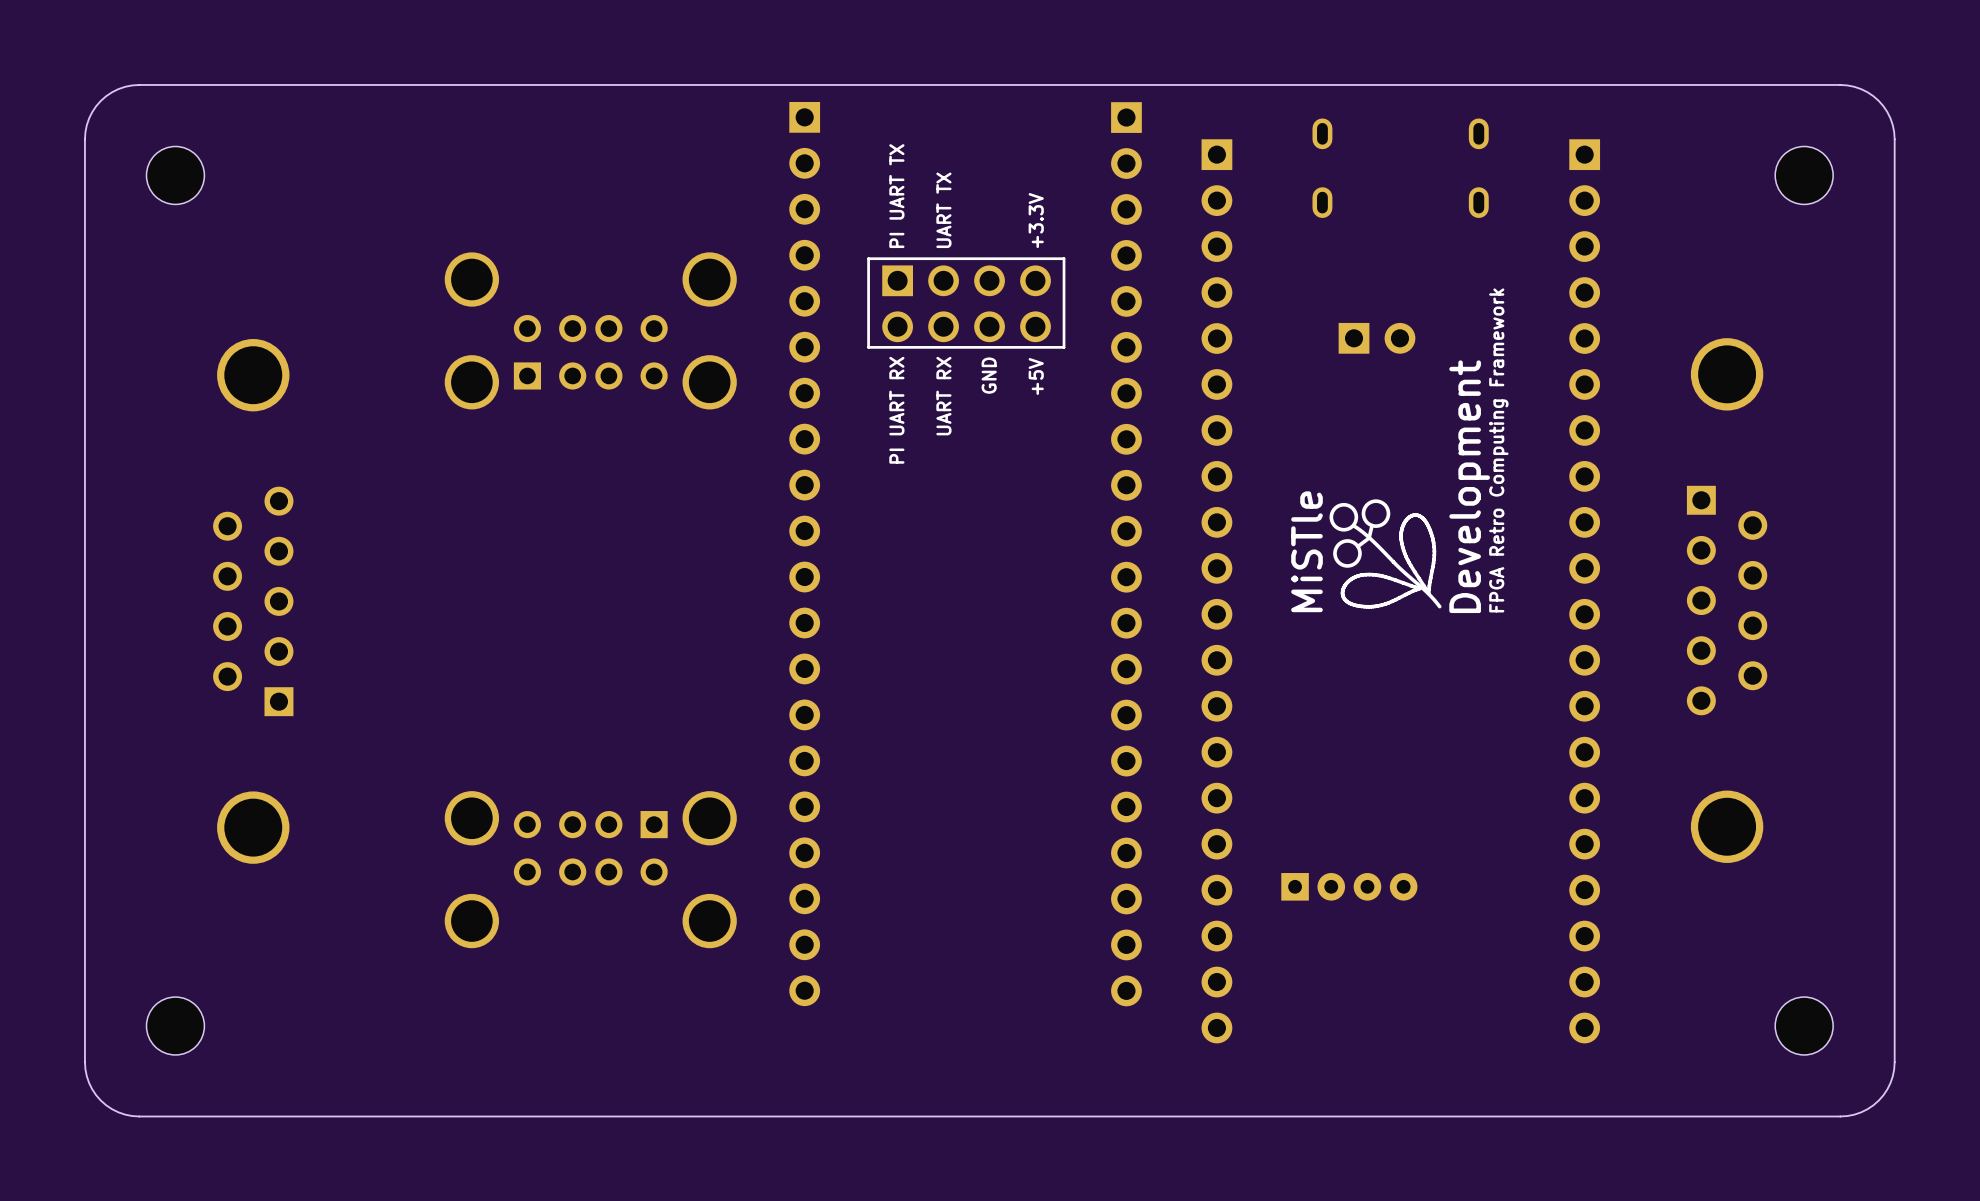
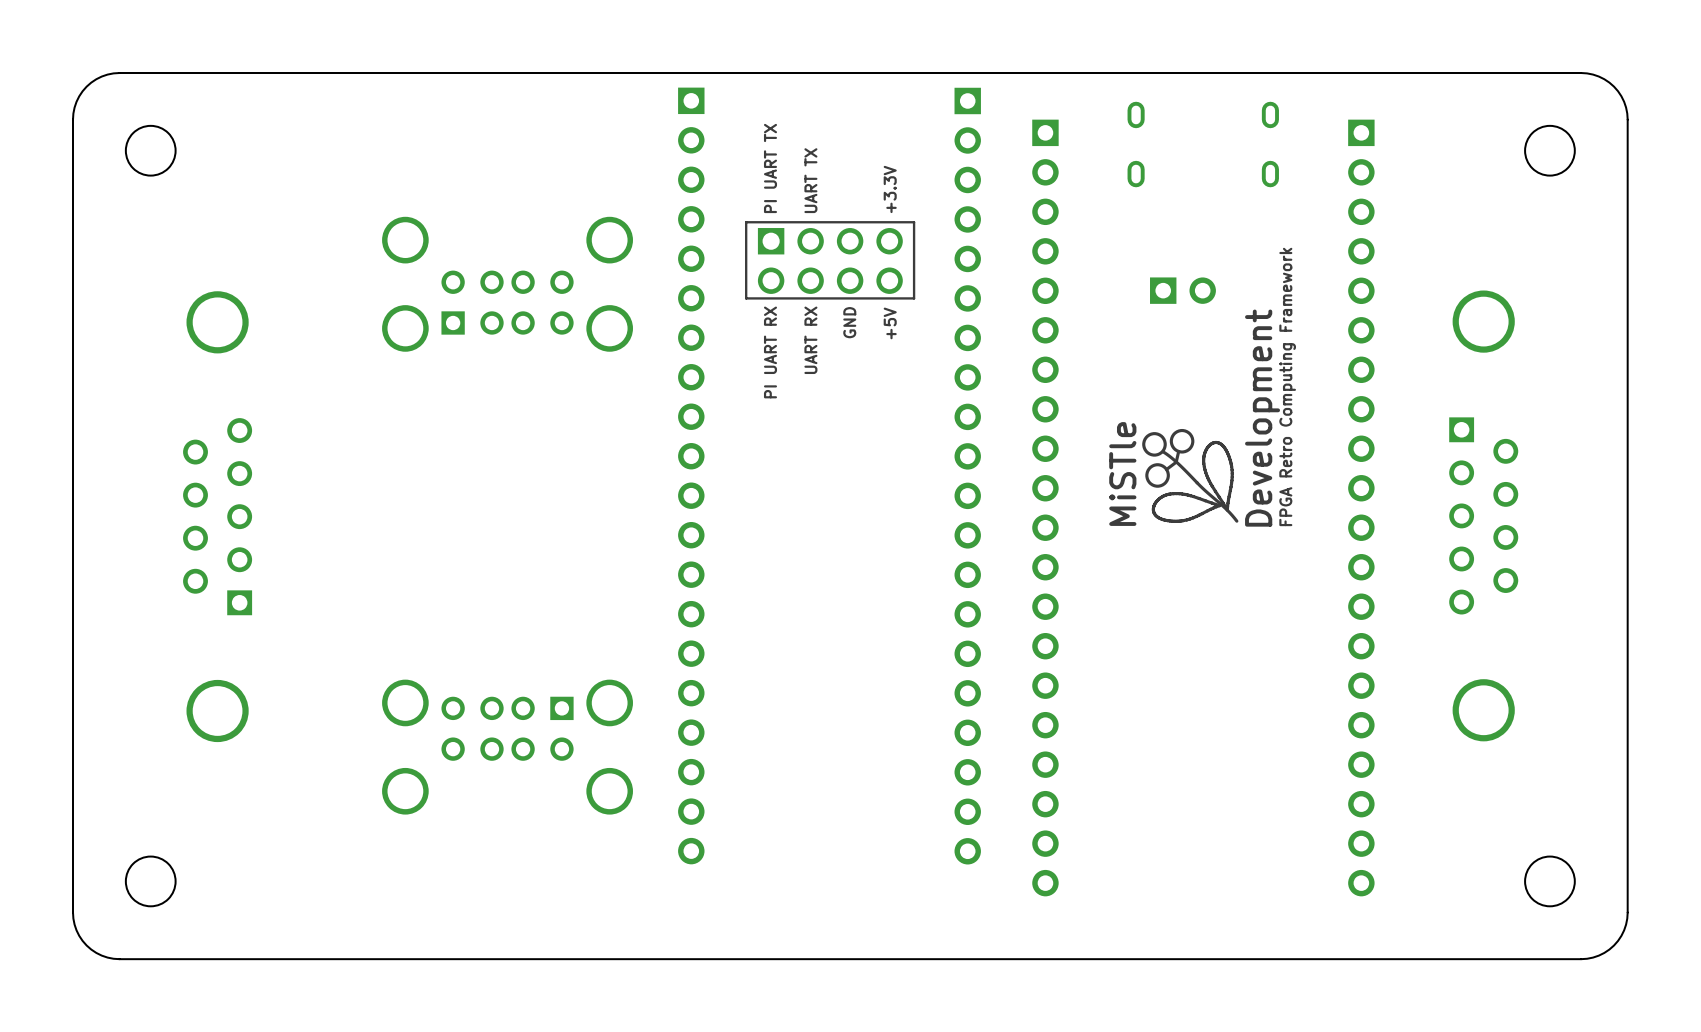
part: (1349, 886) -> none

